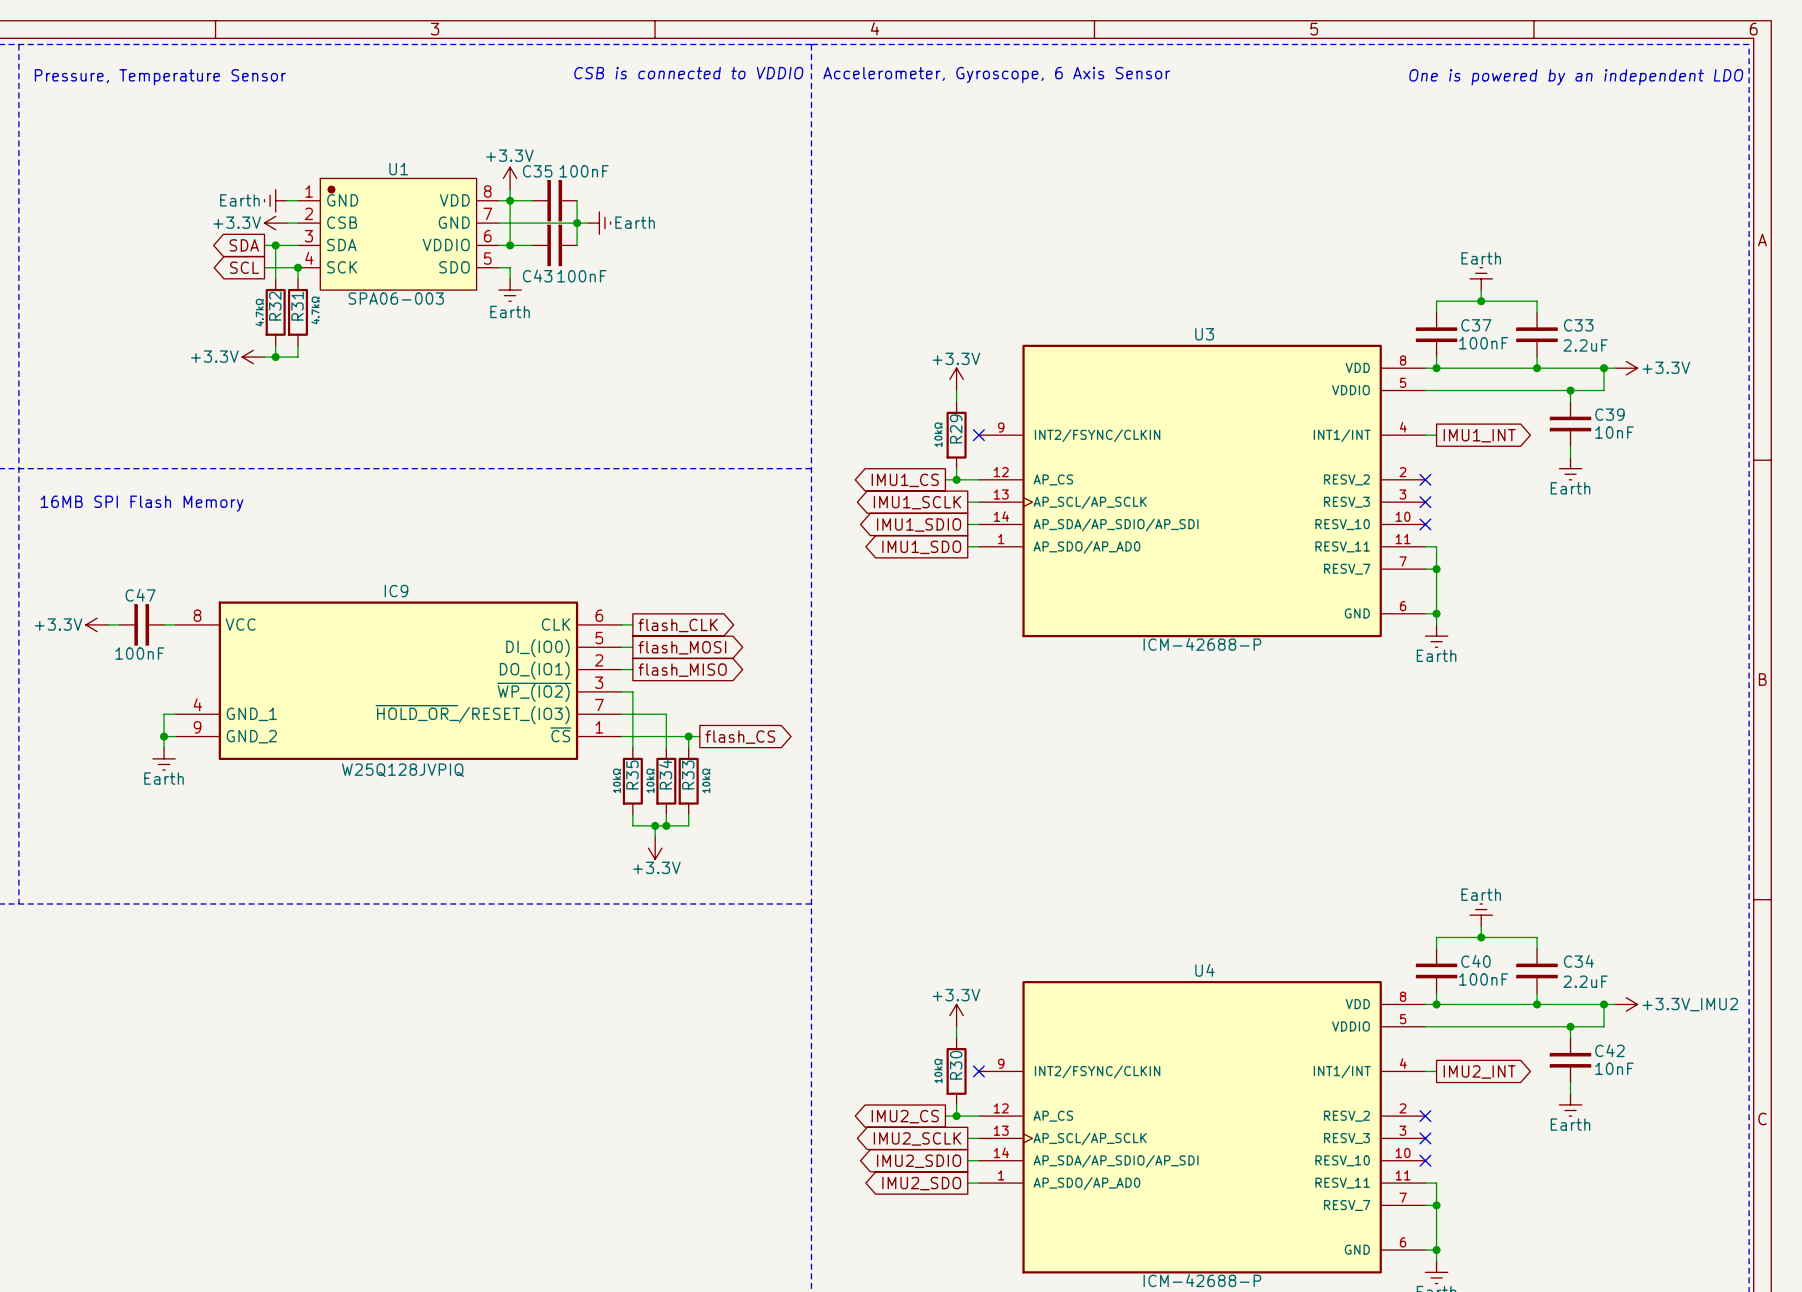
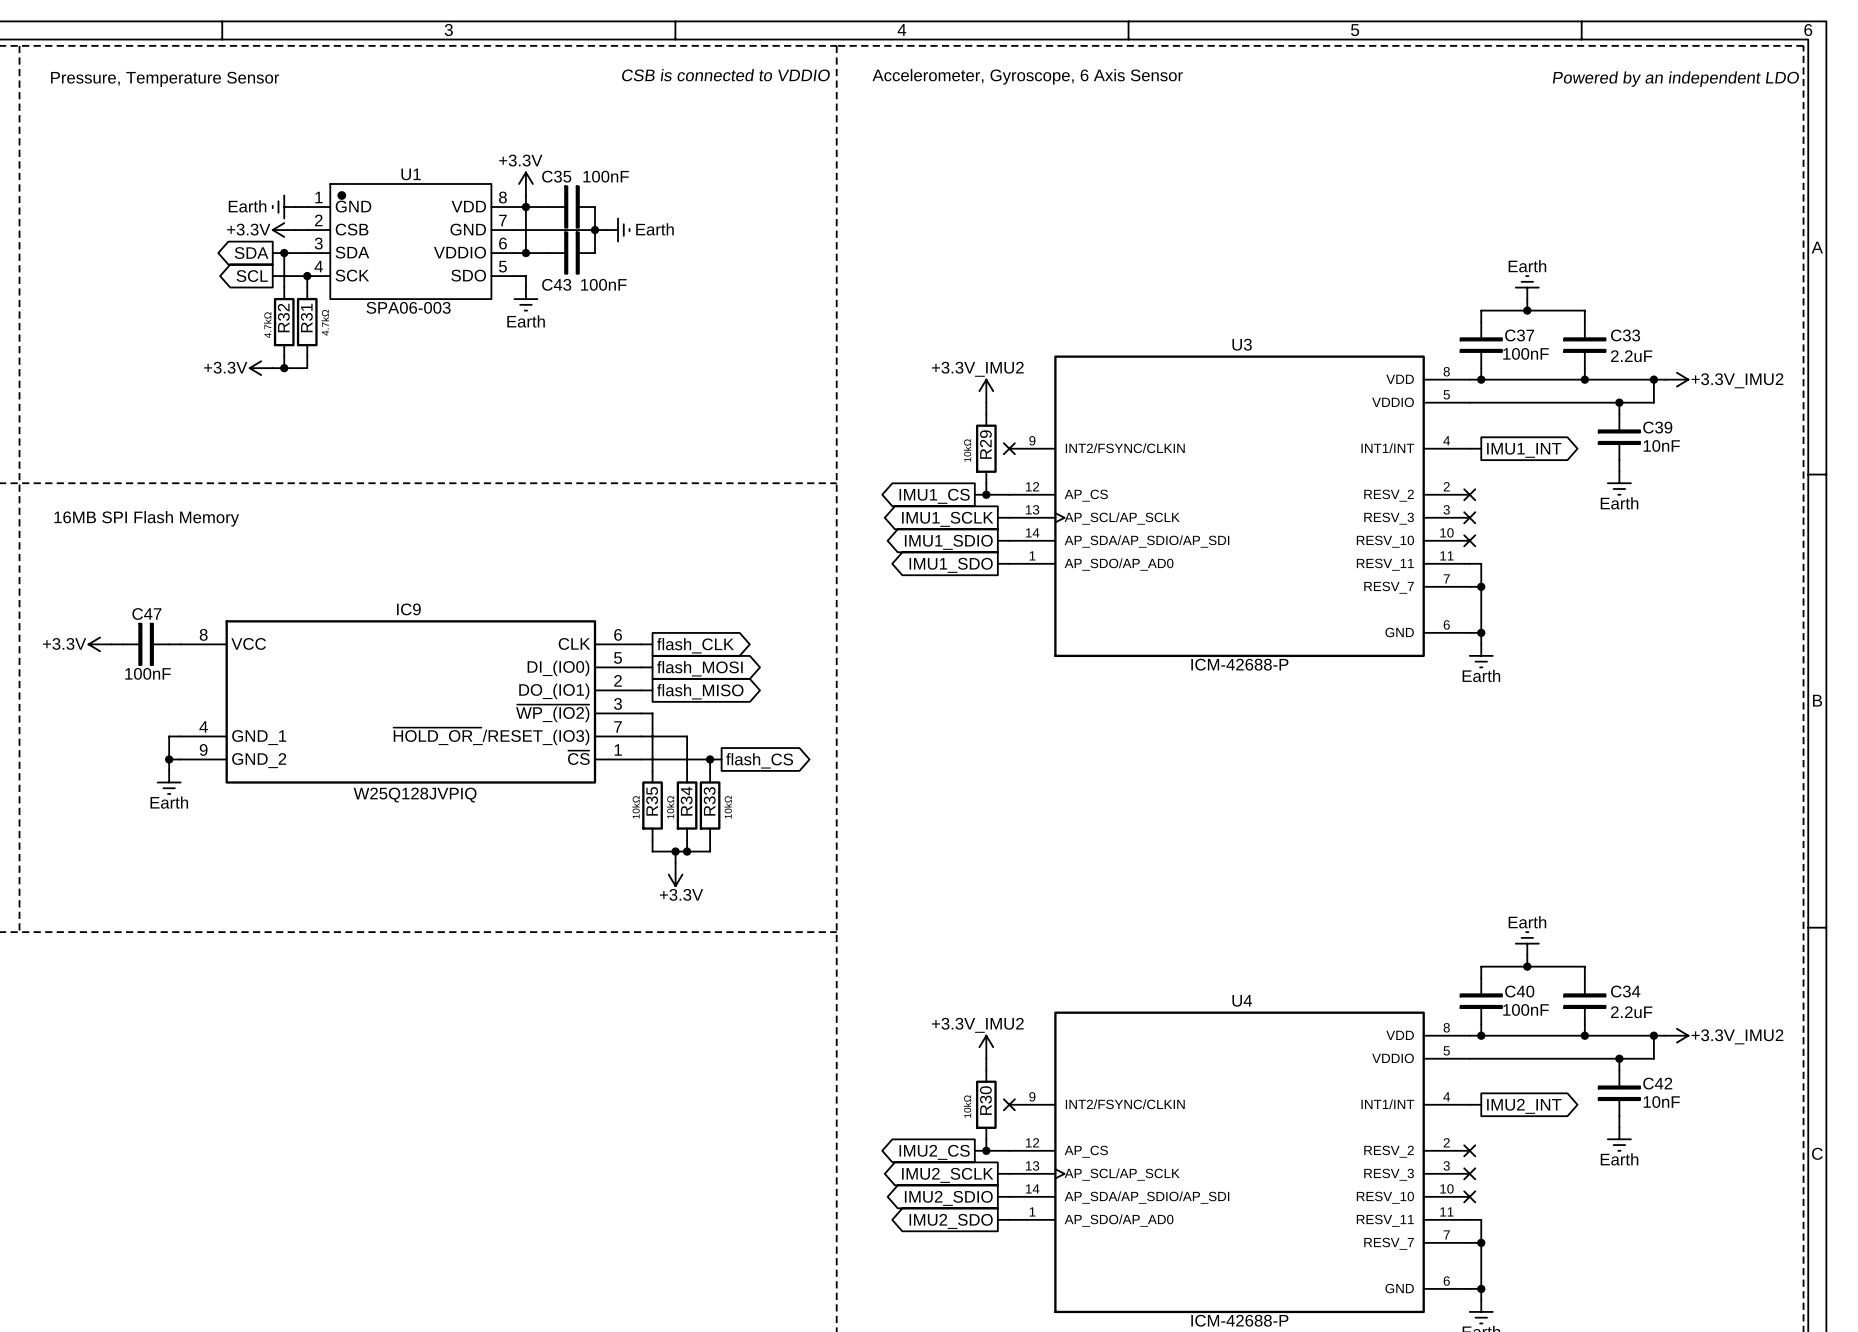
text: One is powered by an independent LDO (1576, 77) -> Powered by an independent LDO (1675, 79)
power symbol: +3.3V (1626, 368) -> +3.3V_IMU2 (1676, 379)
power symbol: +3.3V (956, 379) -> +3.3V_IMU2 (986, 391)
power symbol: +3.3V (956, 1015) -> +3.3V_IMU2 (986, 1047)

